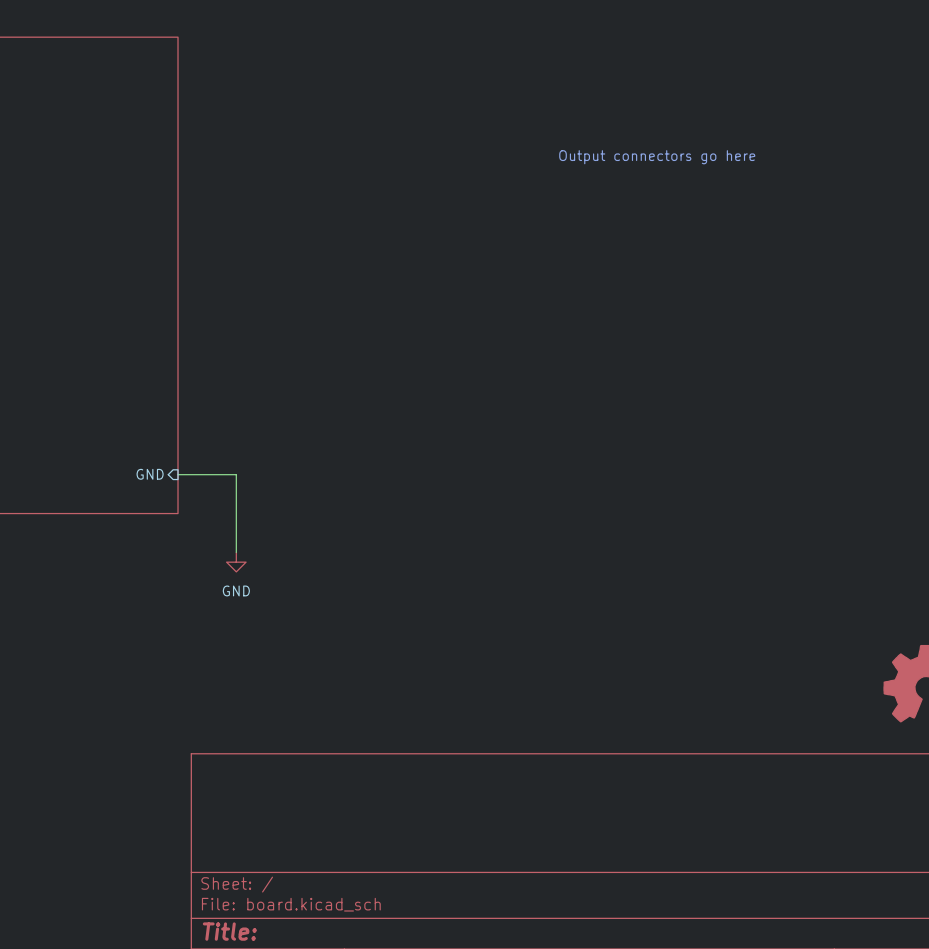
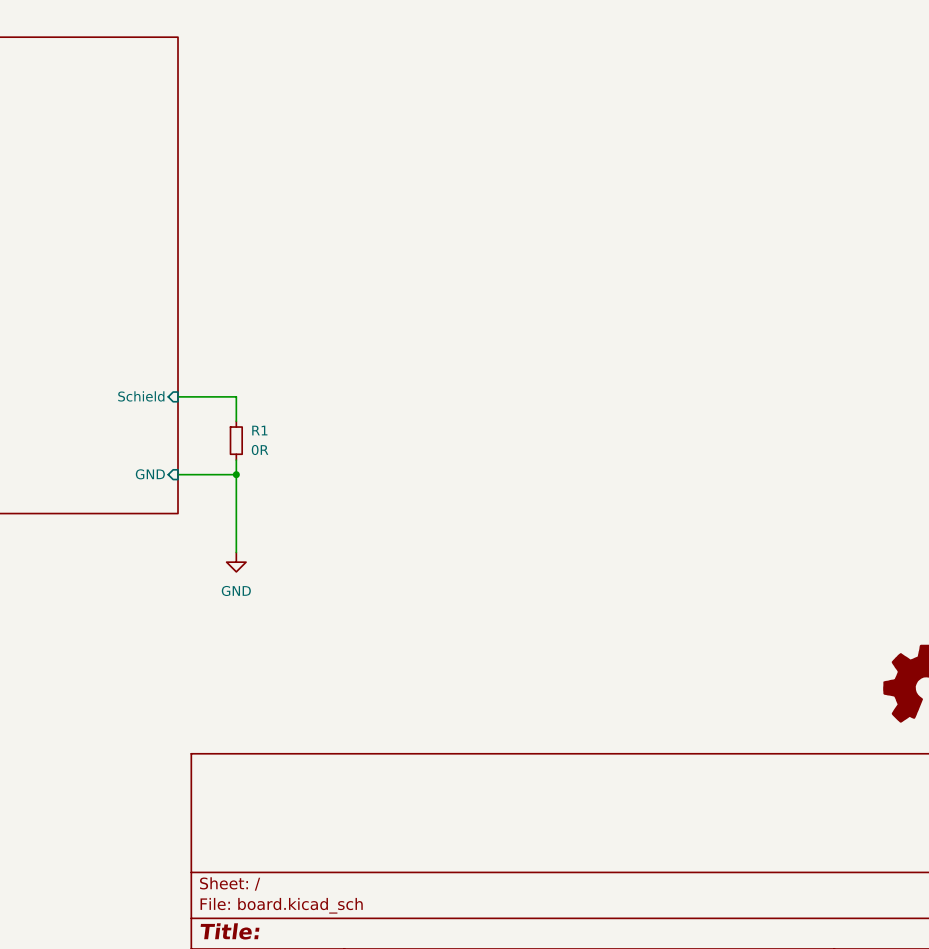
text: Output connectors go here (657, 157) -> none
sheet pin: none -> Schield (141, 396)
wire: none -> (178, 396) (236, 396) (236, 421)
R1: none -> 0R (236, 440)
wire: none -> (236, 460) (236, 474)
junction: none -> (236, 474)

